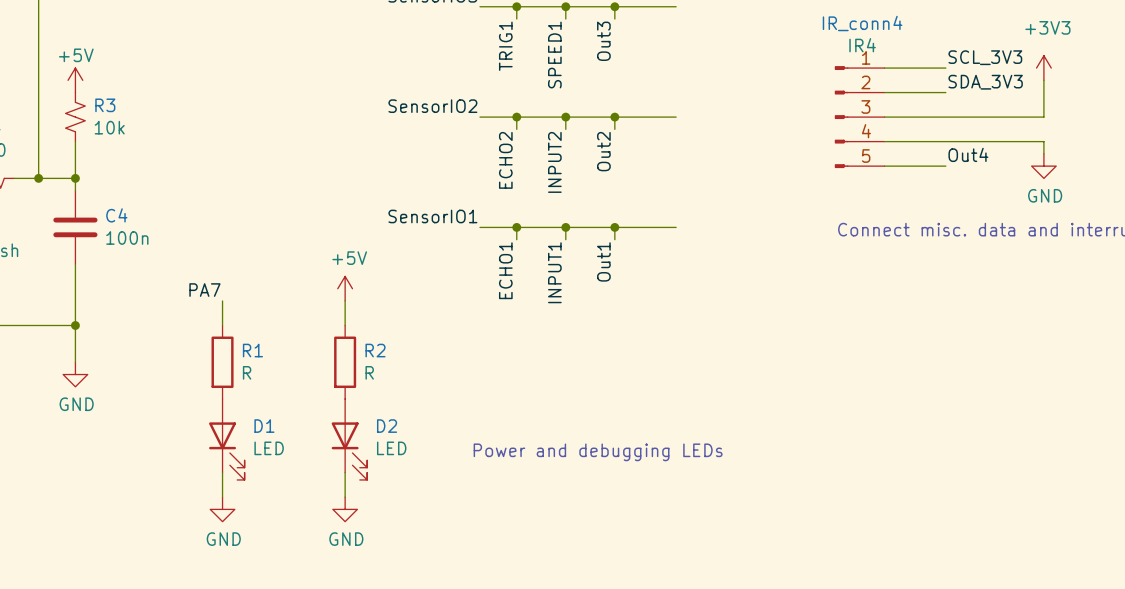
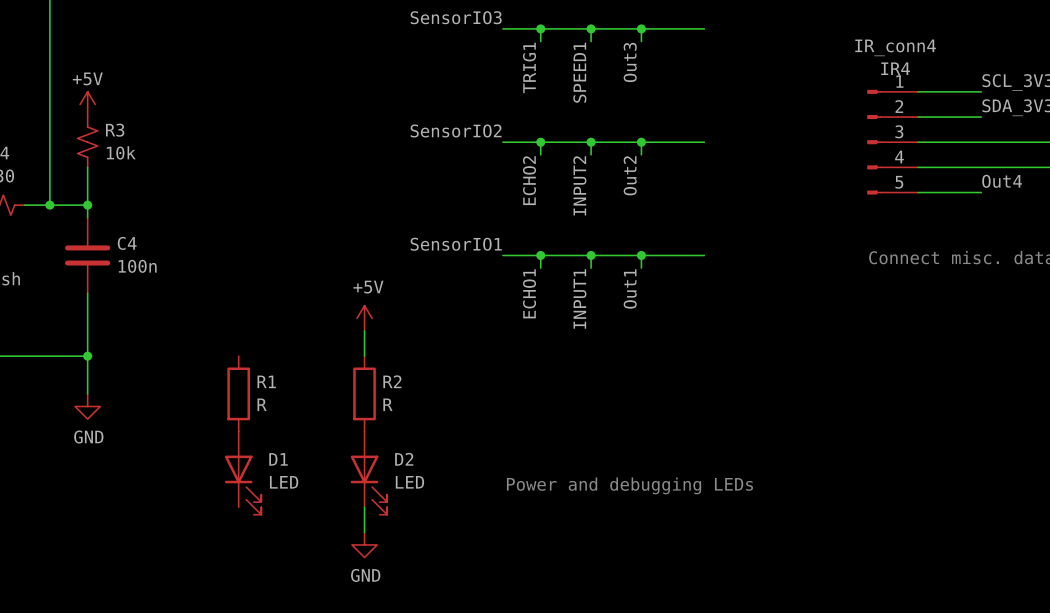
label: PA7 (204, 290) -> none
wire: (222, 300) (222, 325) -> none
wire: (222, 472) (222, 497) -> none
power symbol: GND (222, 509) -> none

